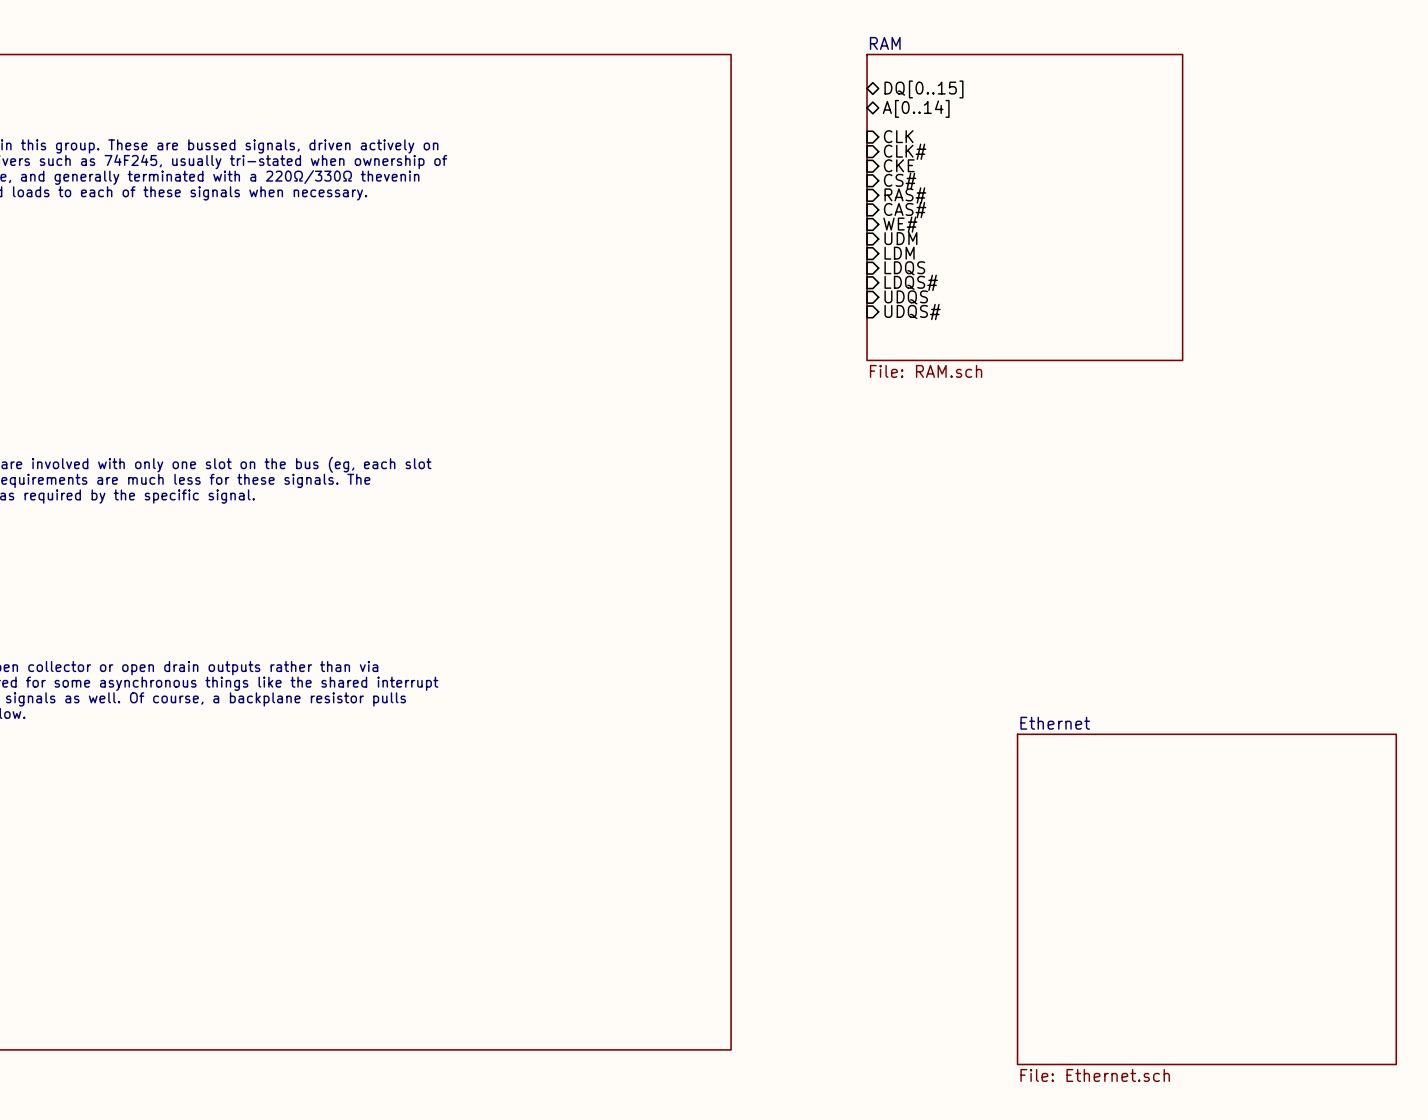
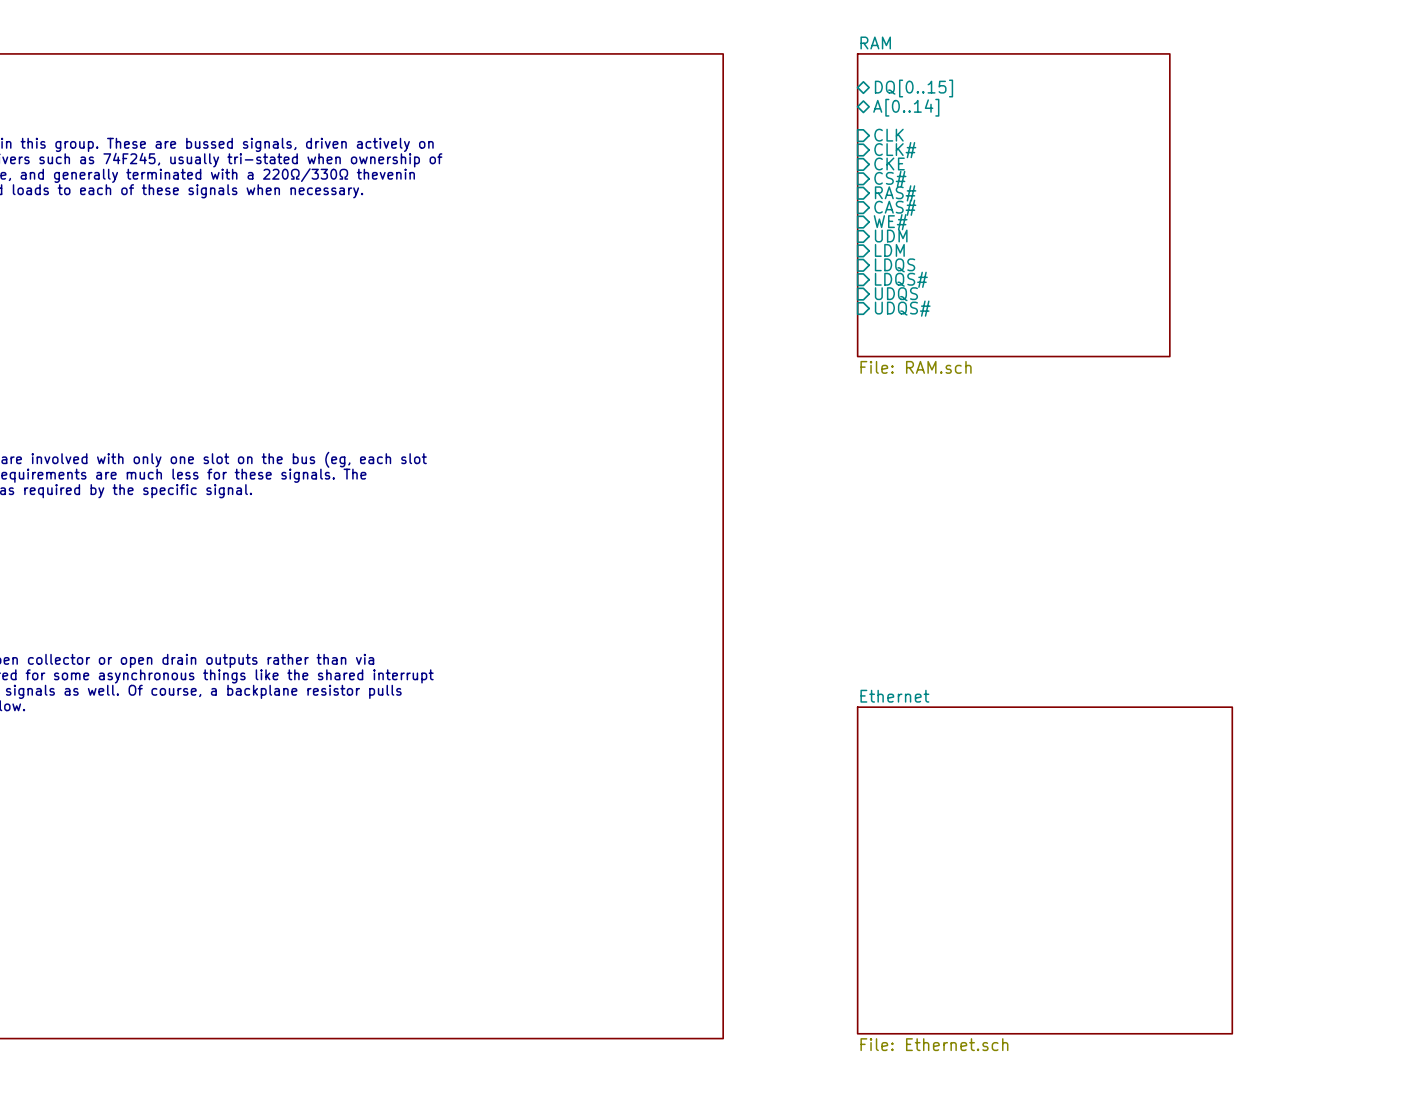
sheet Ethernet position: (1206, 899) -> (1044, 870)

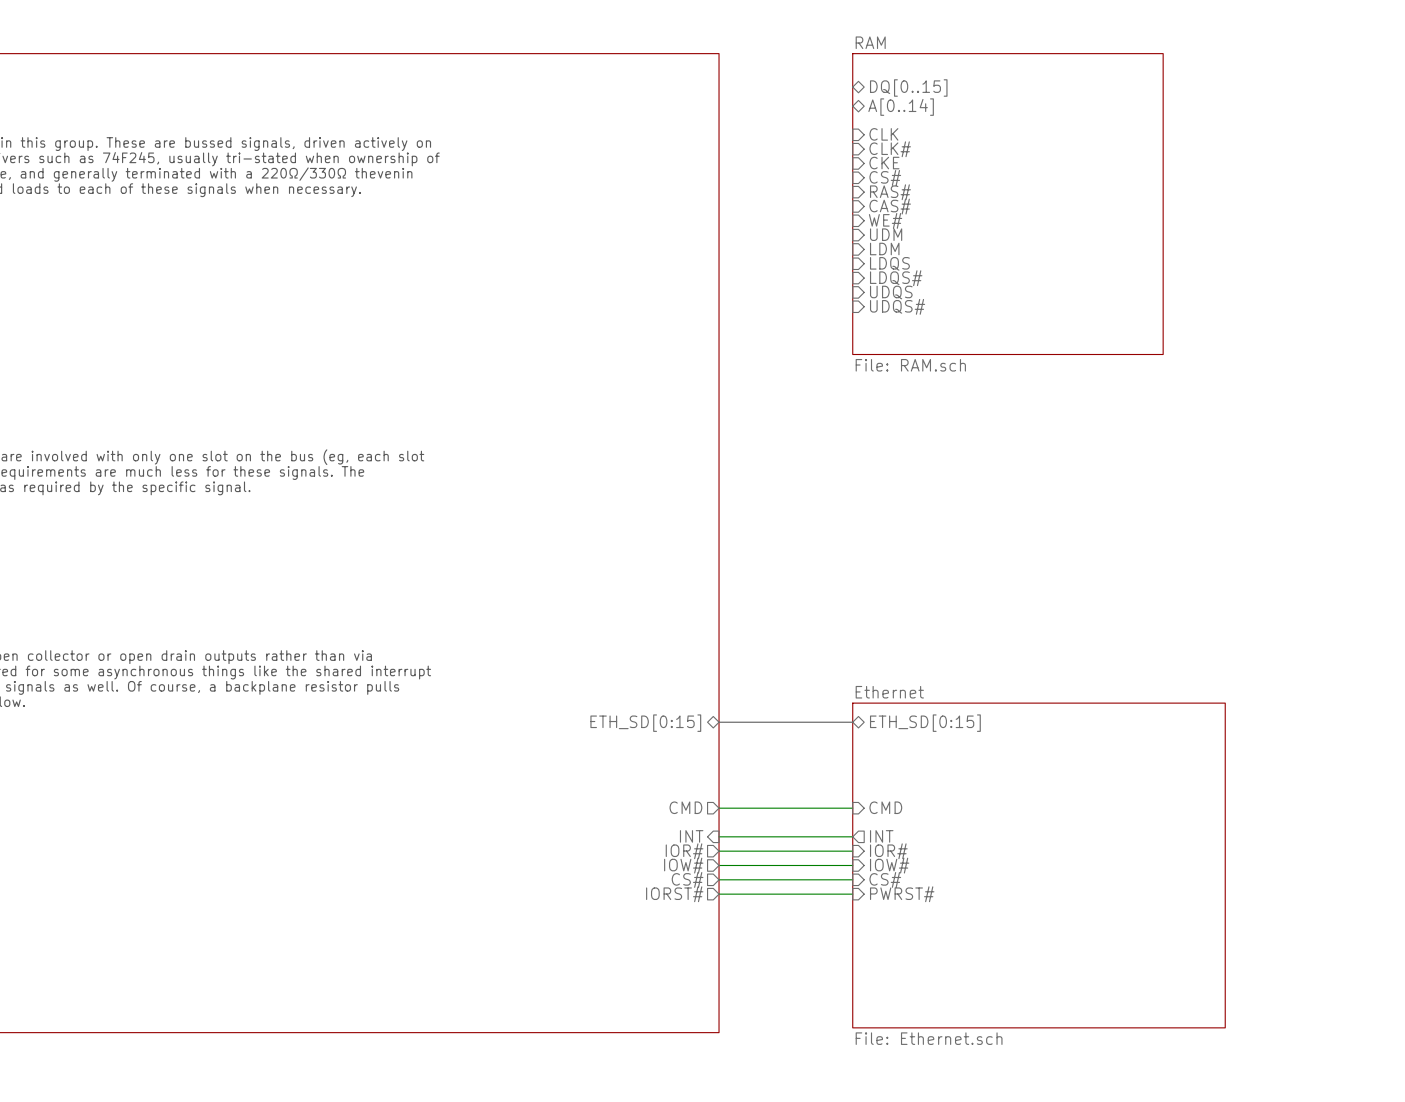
bus: none -> (719, 722) (852, 722)
sheet pin: none -> ETH_SD[0:15] (645, 723)
sheet pin: none -> ETH_SD[0:15] (925, 723)
sheet pin: none -> CMD (685, 807)
wire: none -> (719, 808) (852, 808)
sheet pin: none -> CMD (885, 807)
sheet pin: none -> INT (691, 836)
wire: none -> (719, 836) (852, 836)
sheet pin: none -> INT (881, 836)
sheet pin: none -> IOR# (684, 851)
wire: none -> (719, 851) (852, 851)
sheet pin: none -> IOR# (888, 851)
sheet pin: none -> IOW# (683, 865)
wire: none -> (719, 865) (852, 865)
sheet pin: none -> IOW# (889, 865)
wire: none -> (719, 879) (852, 879)
sheet pin: none -> CS# (687, 879)
sheet pin: none -> CS# (885, 879)
sheet pin: none -> IORST# (674, 894)
wire: none -> (719, 894) (852, 894)
sheet pin: none -> PWRST# (902, 894)

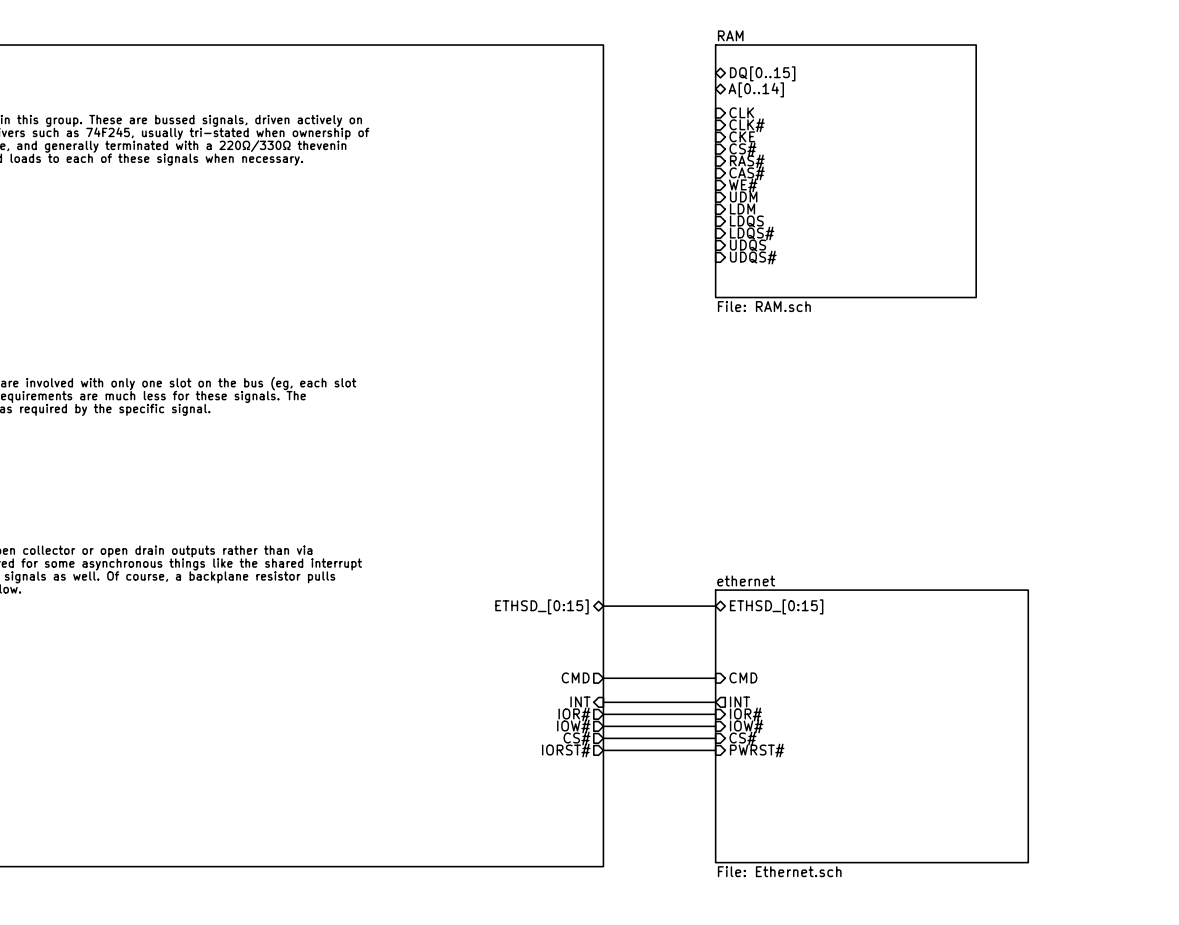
sheet Ethernet name: Ethernet (889, 692) -> ethernet (746, 580)
sheet pin: ETH_SD[0:15] (645, 723) -> ETHSD_[0:15] (541, 606)
sheet pin: ETH_SD[0:15] (925, 723) -> ETHSD_[0:15] (776, 606)

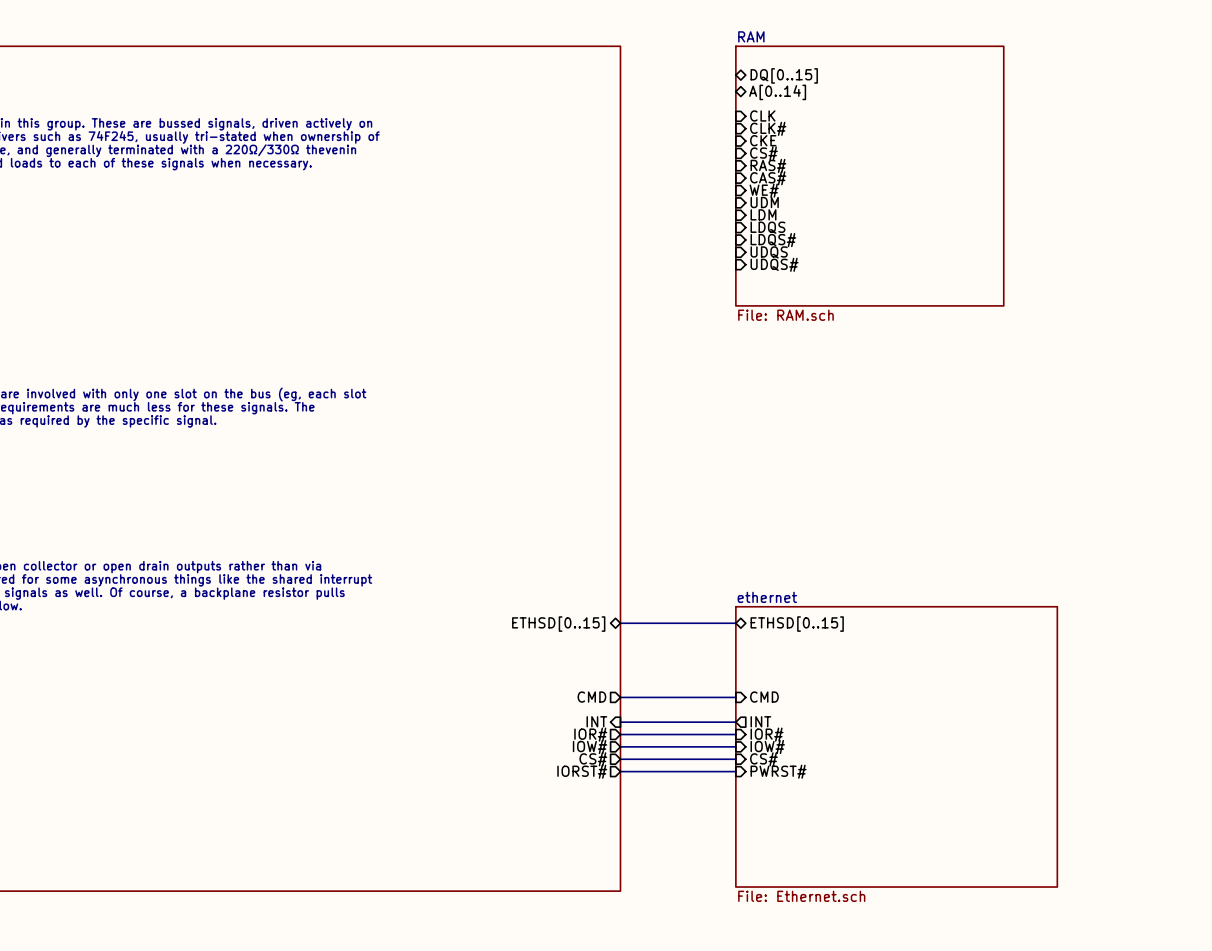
sheet pin: ETHSD_[0:15] (541, 606) -> ETHSD[0..15] (558, 624)
sheet pin: ETHSD_[0:15] (776, 606) -> ETHSD[0..15] (797, 624)

